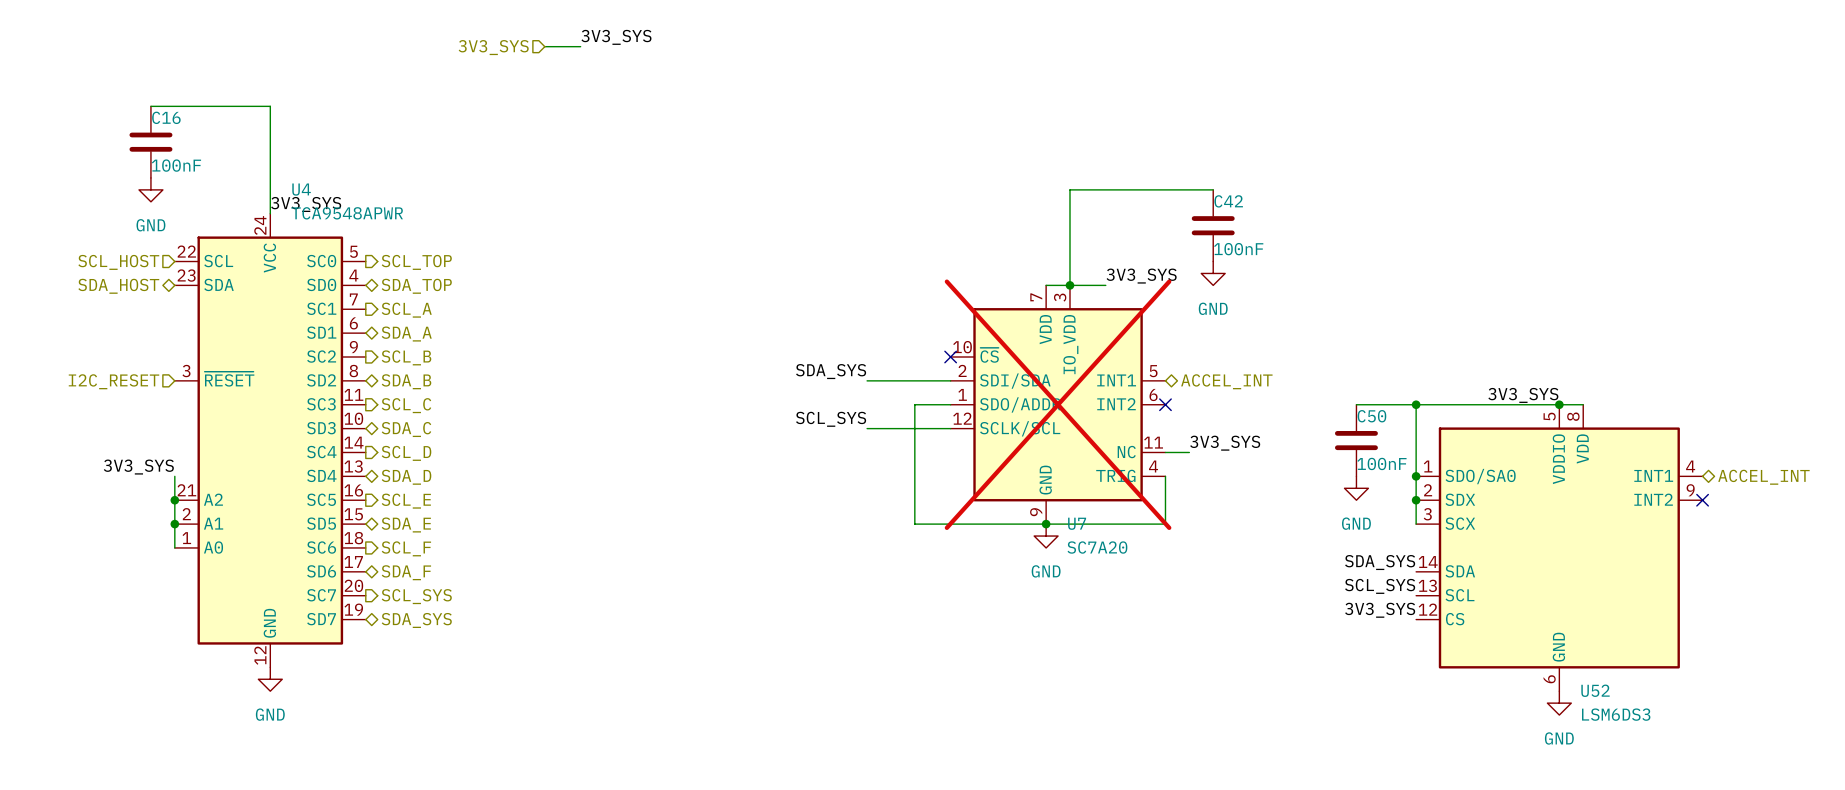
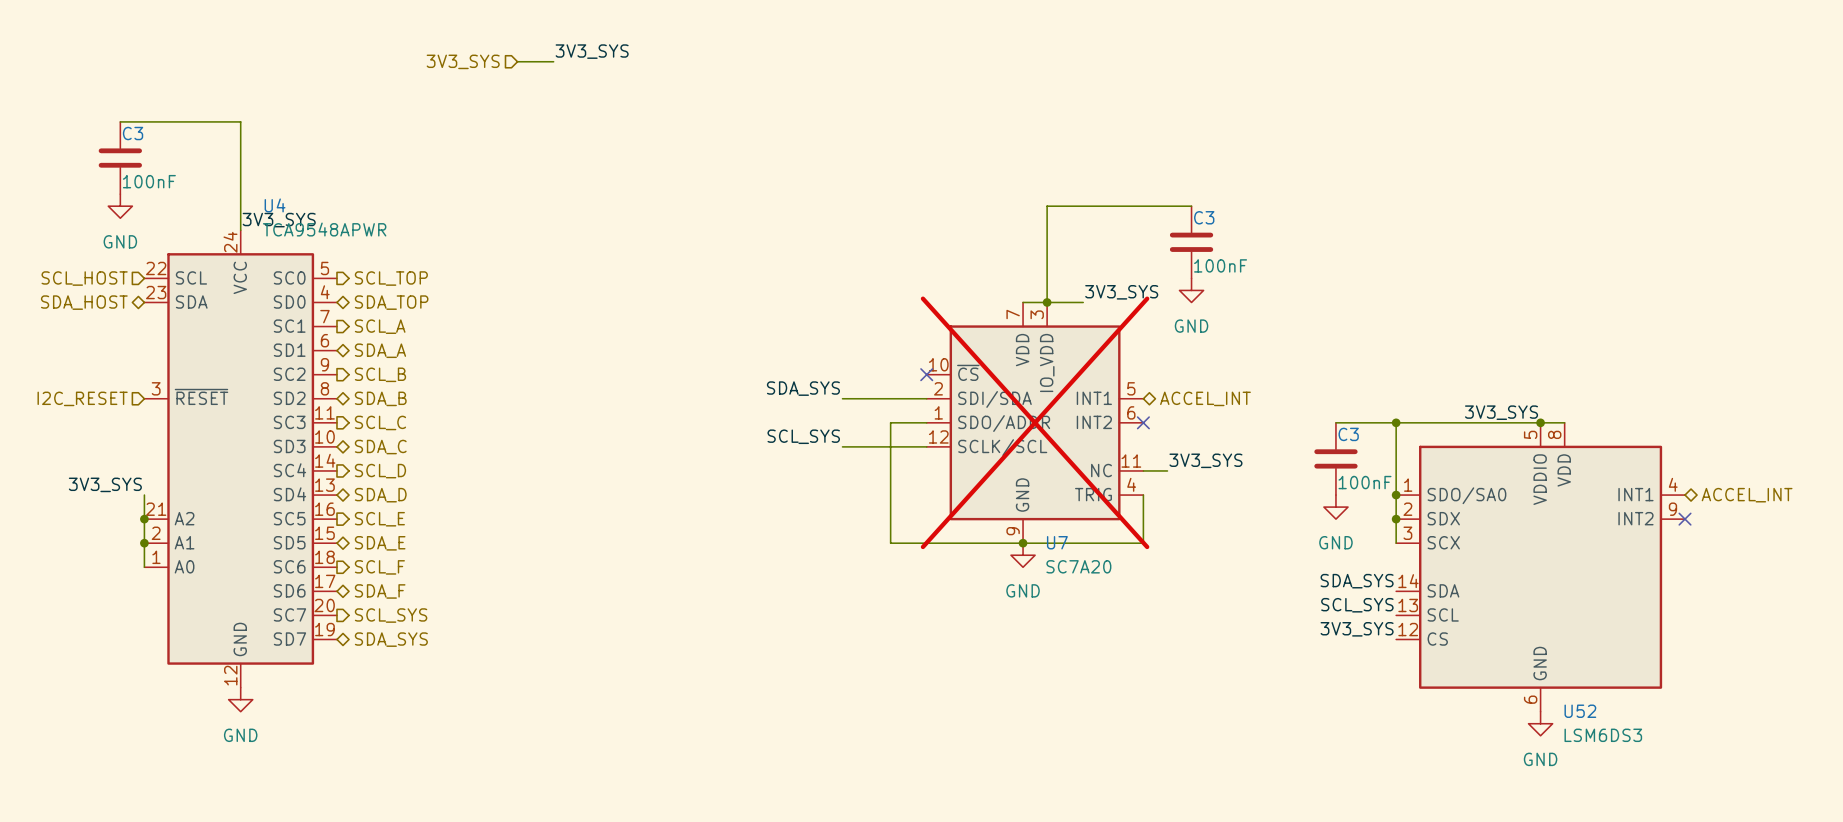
C16 name: C16 (166, 117) -> C3 (133, 133)
C42 name: C42 (1228, 201) -> C3 (1204, 217)
C50 name: C50 (1371, 416) -> C3 (1348, 434)

